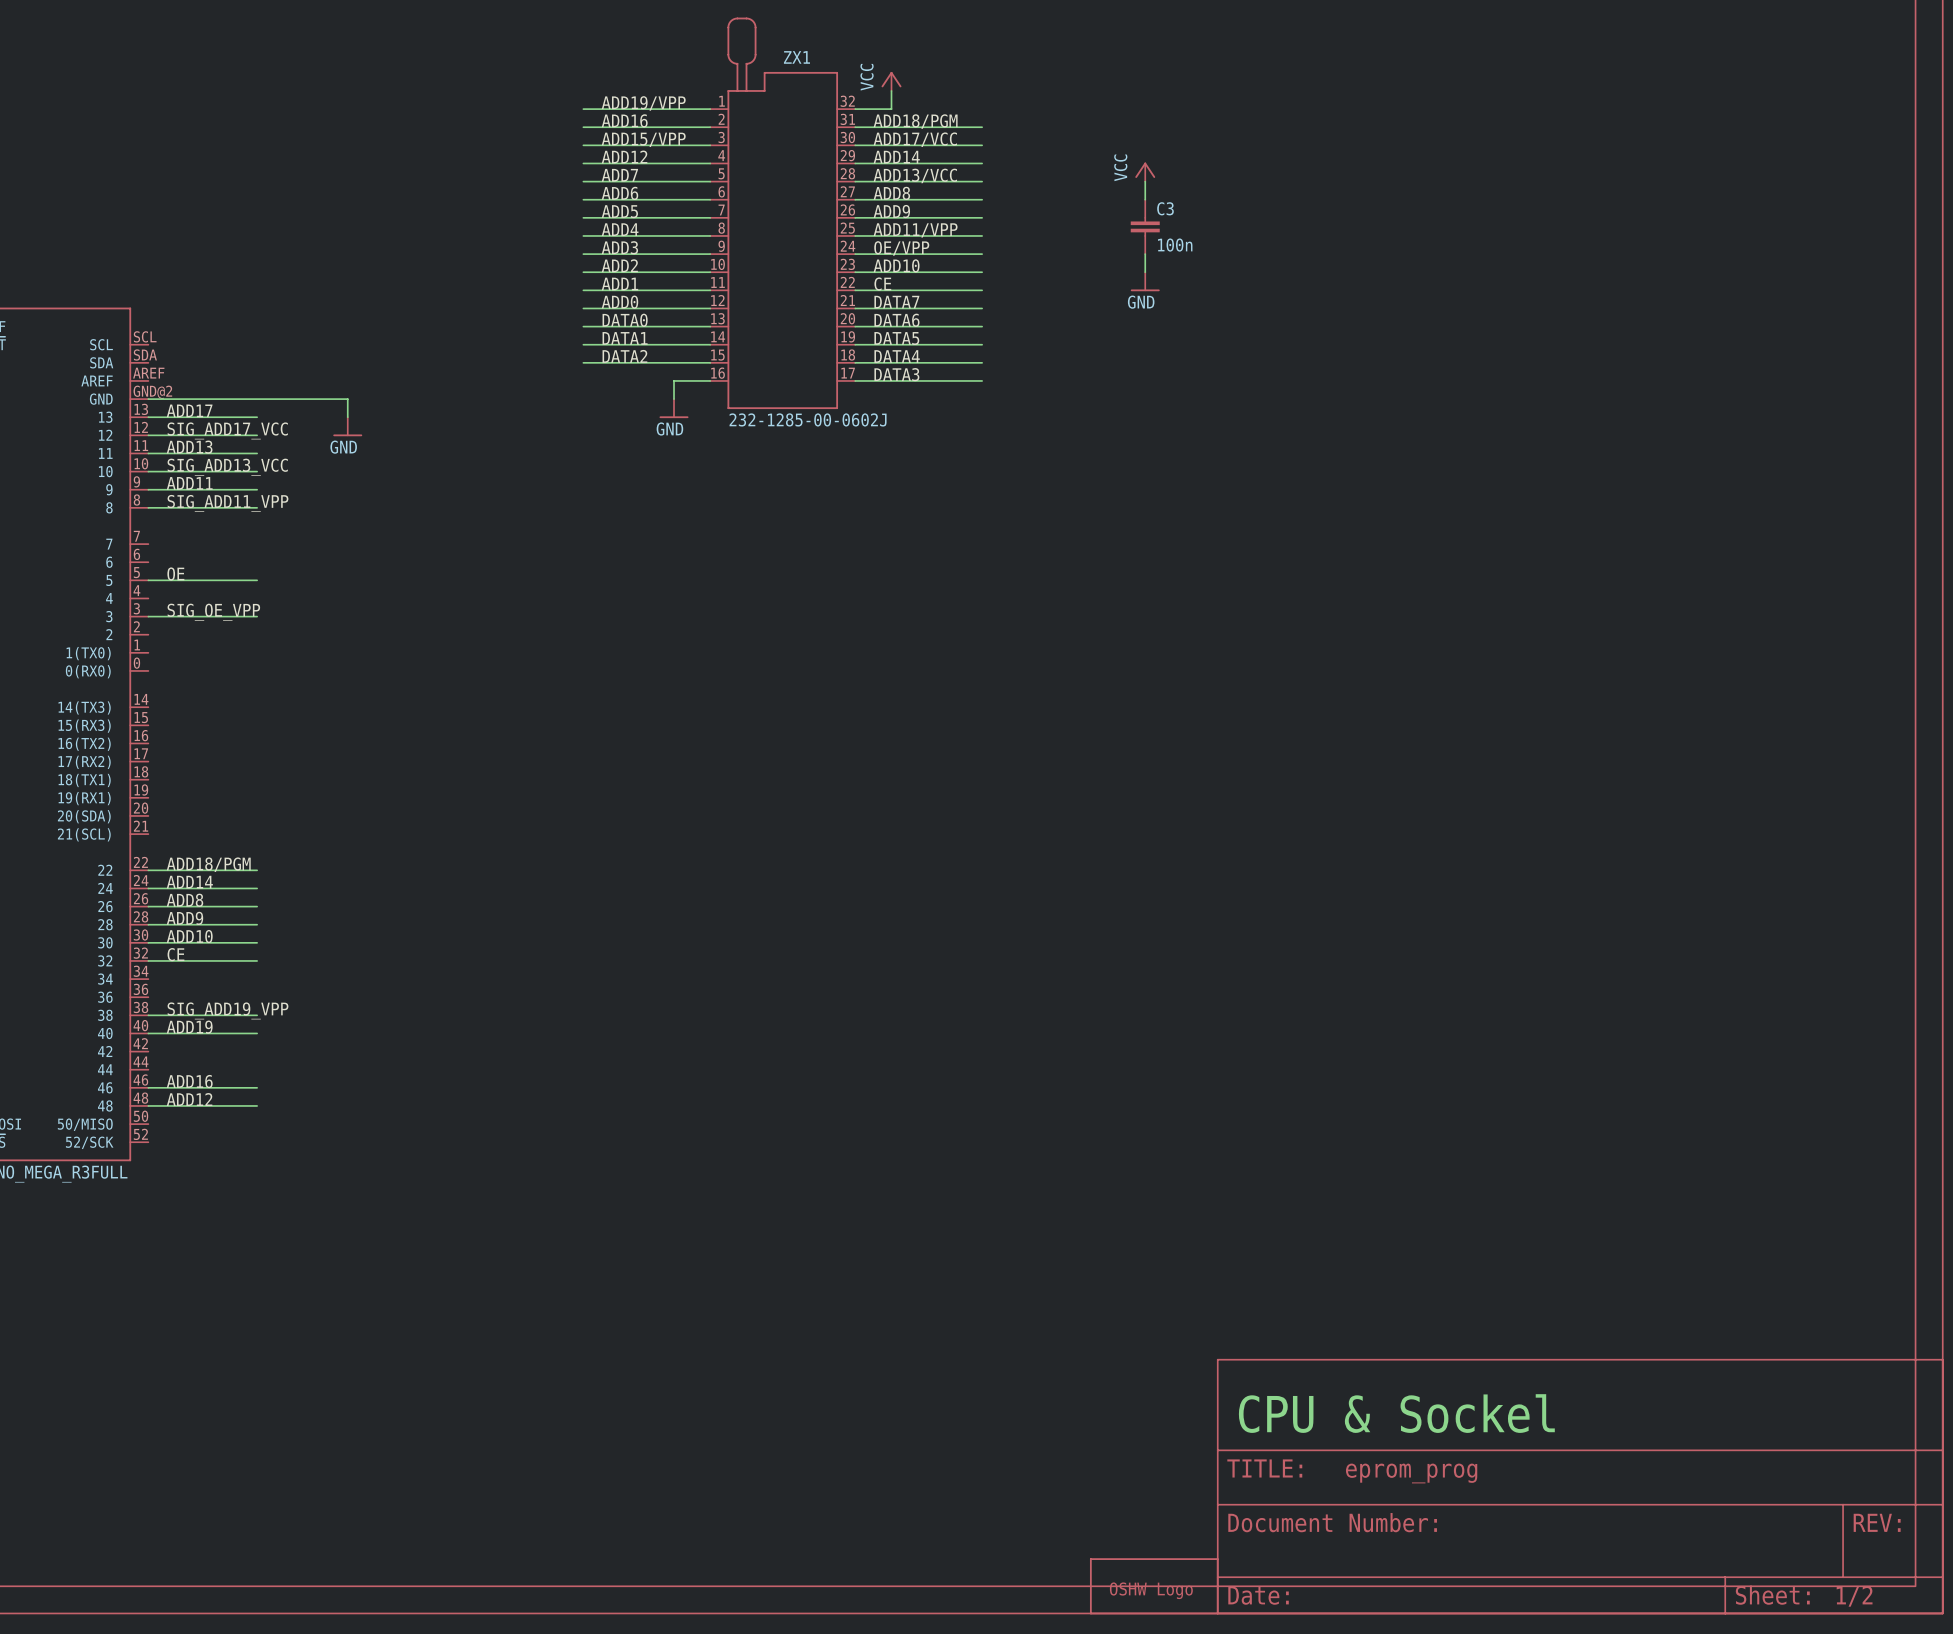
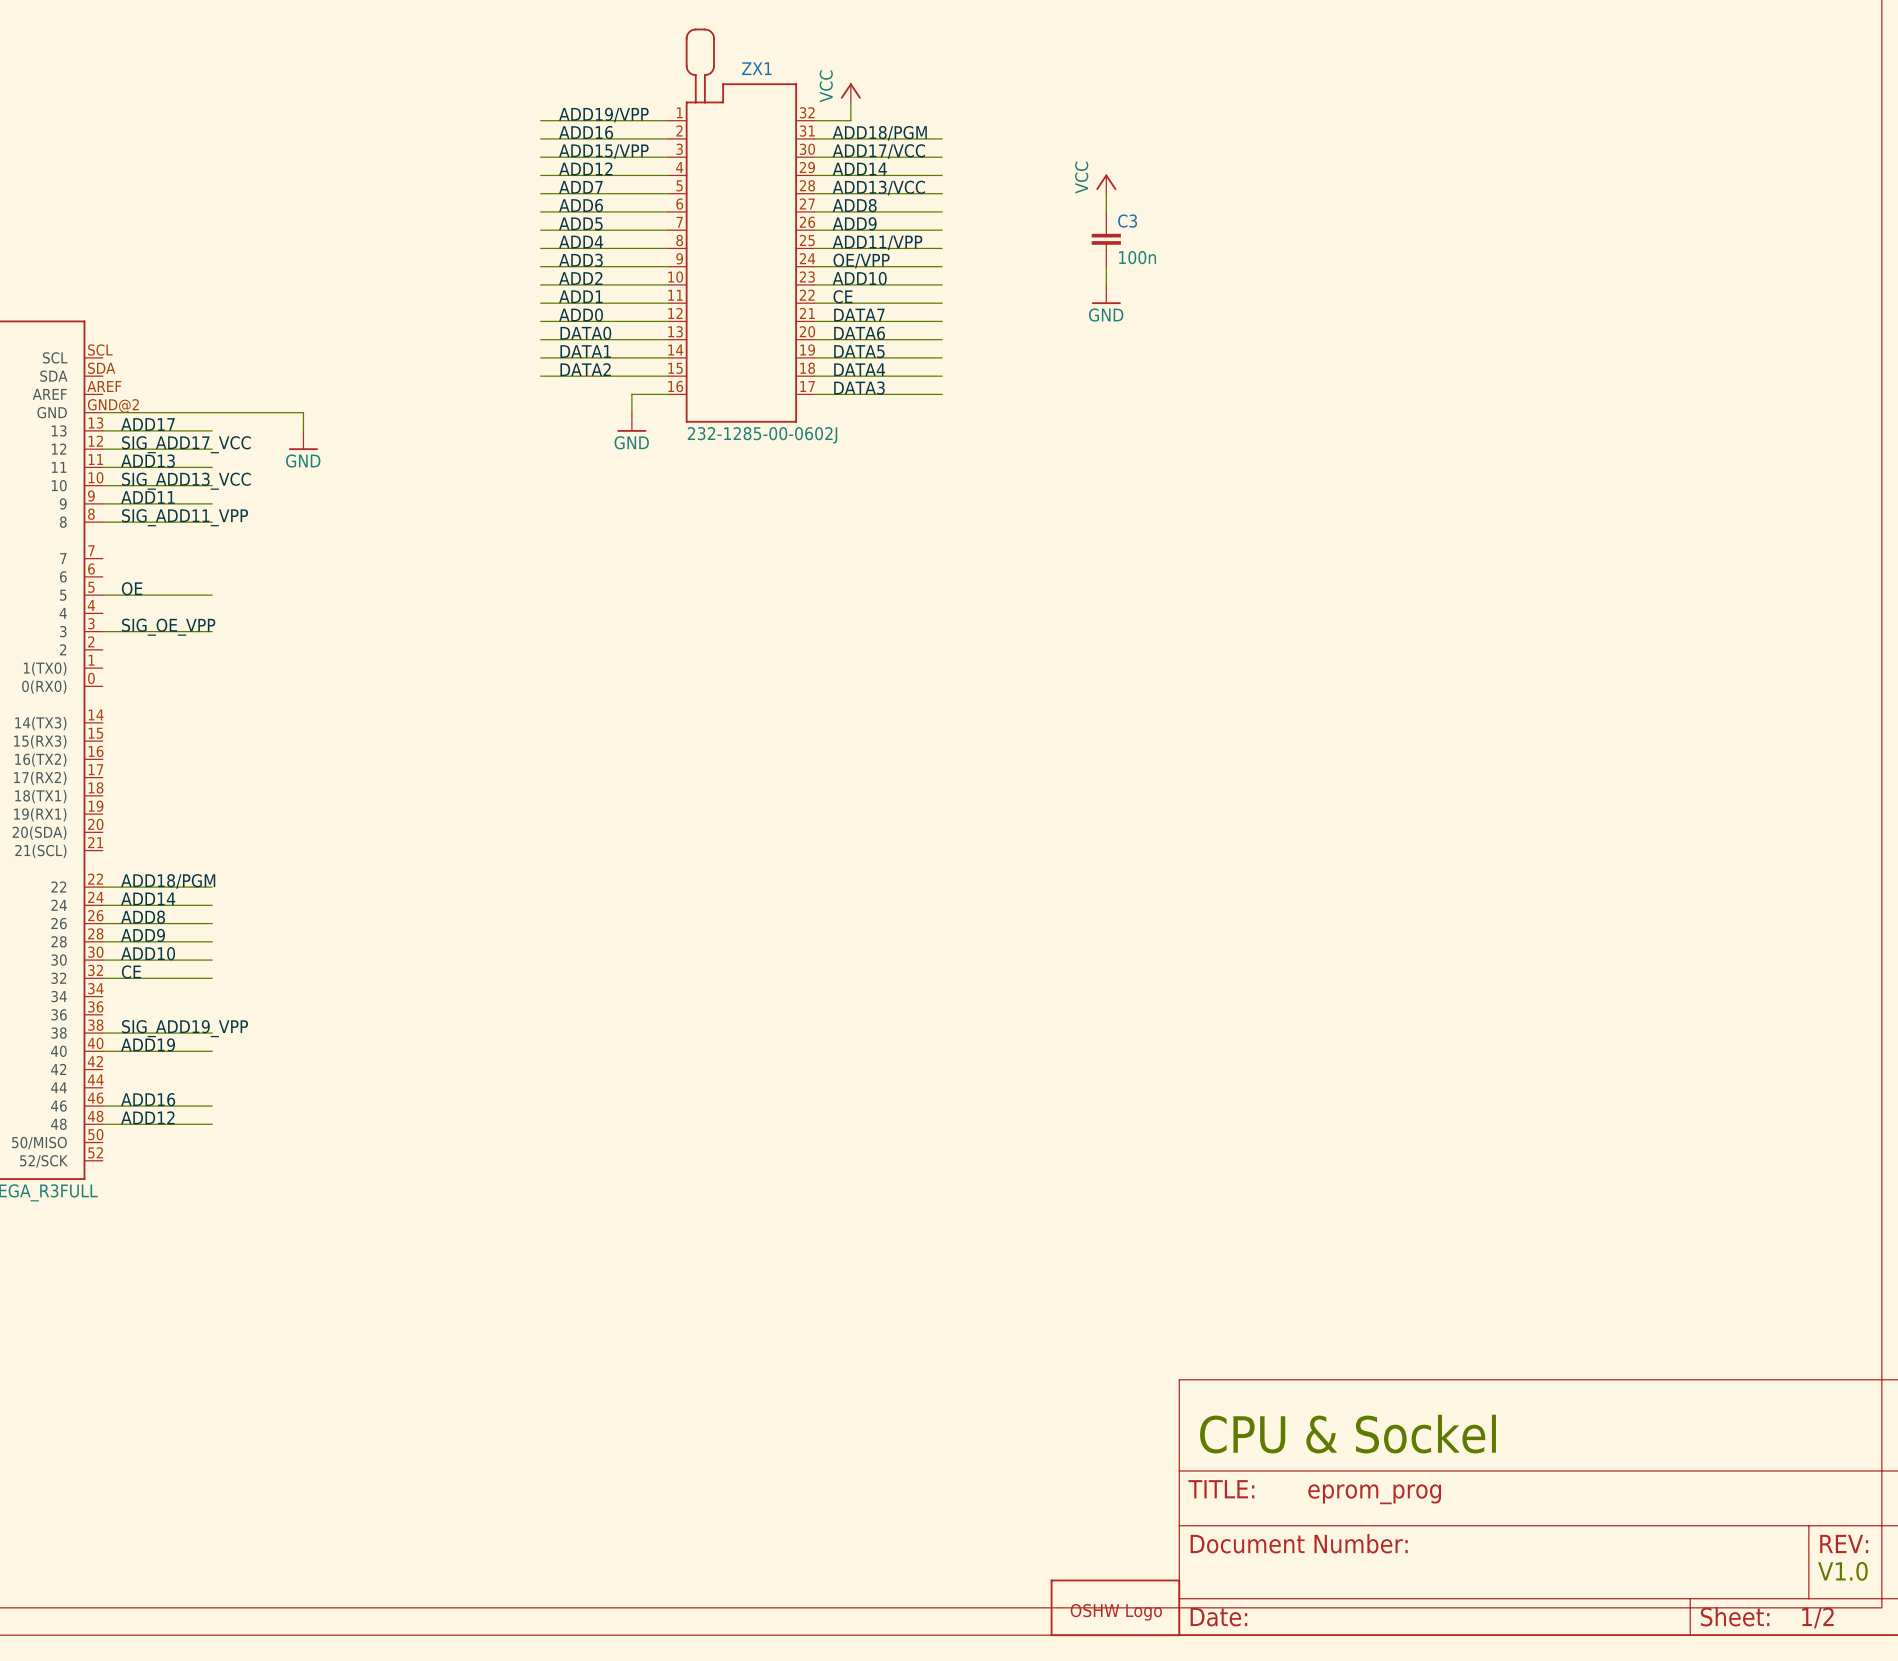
text: none -> V1.0 (1842, 1571)

